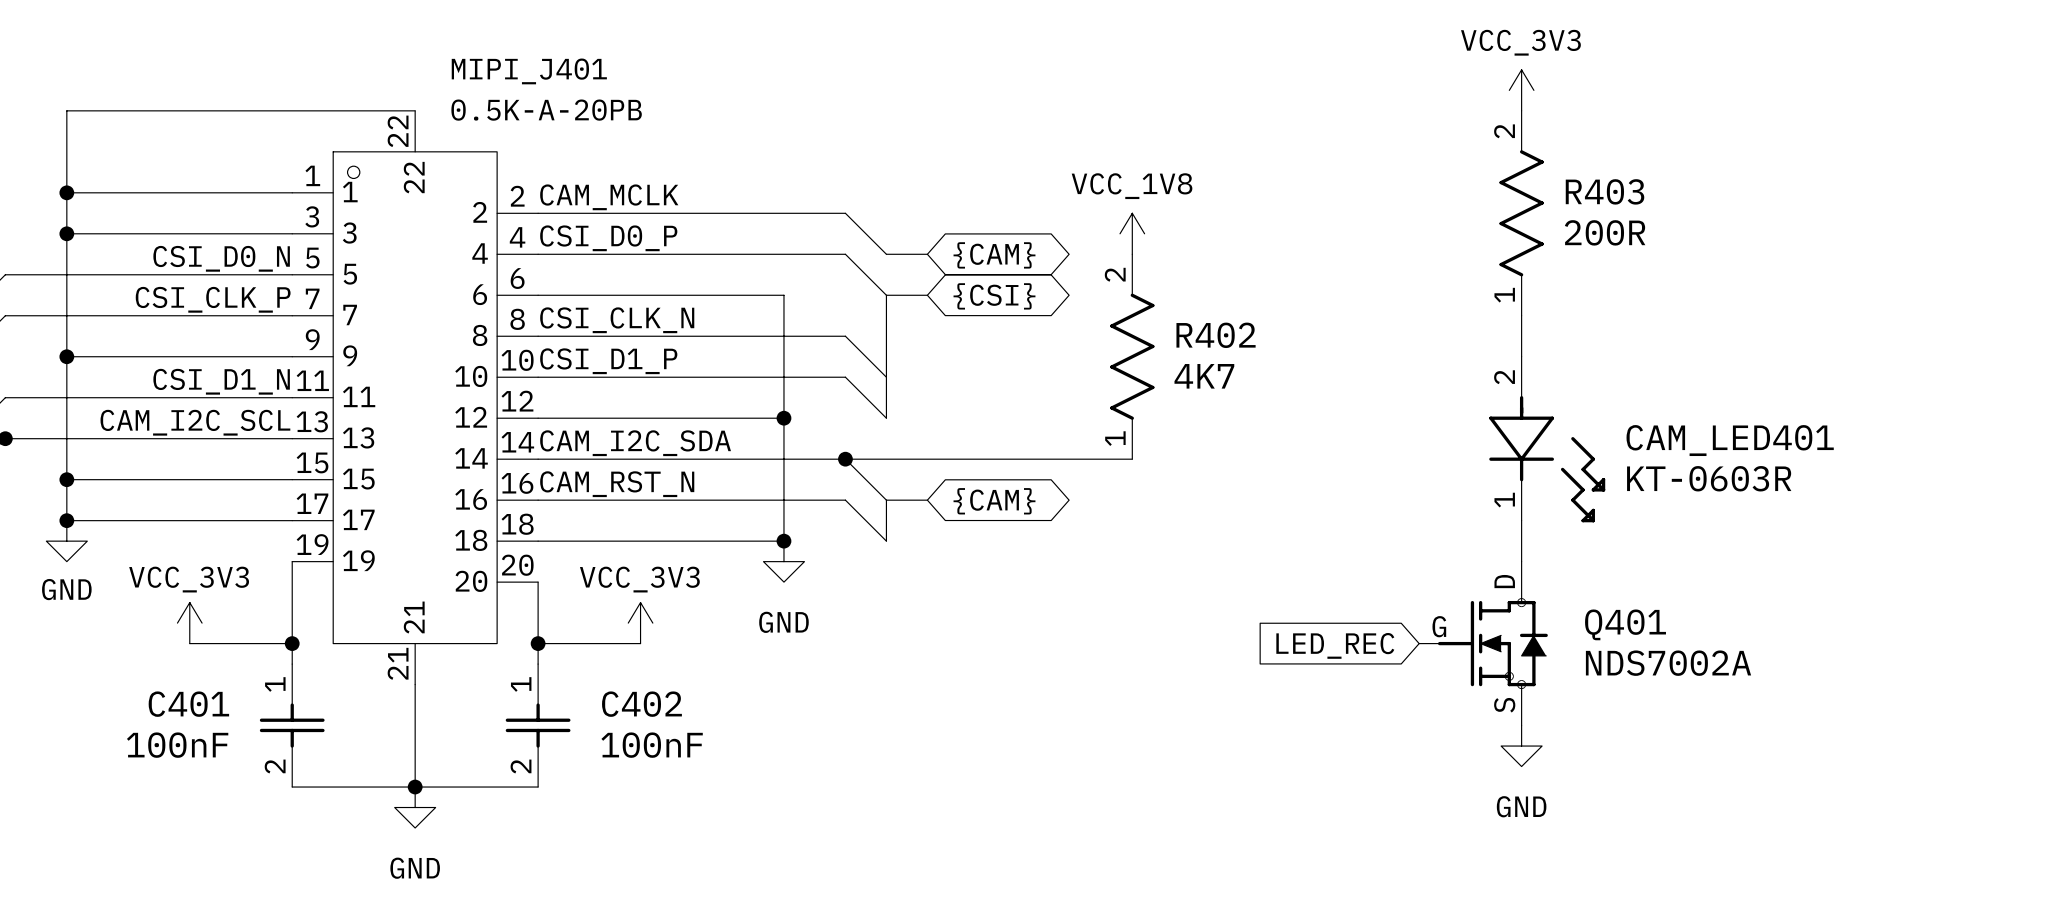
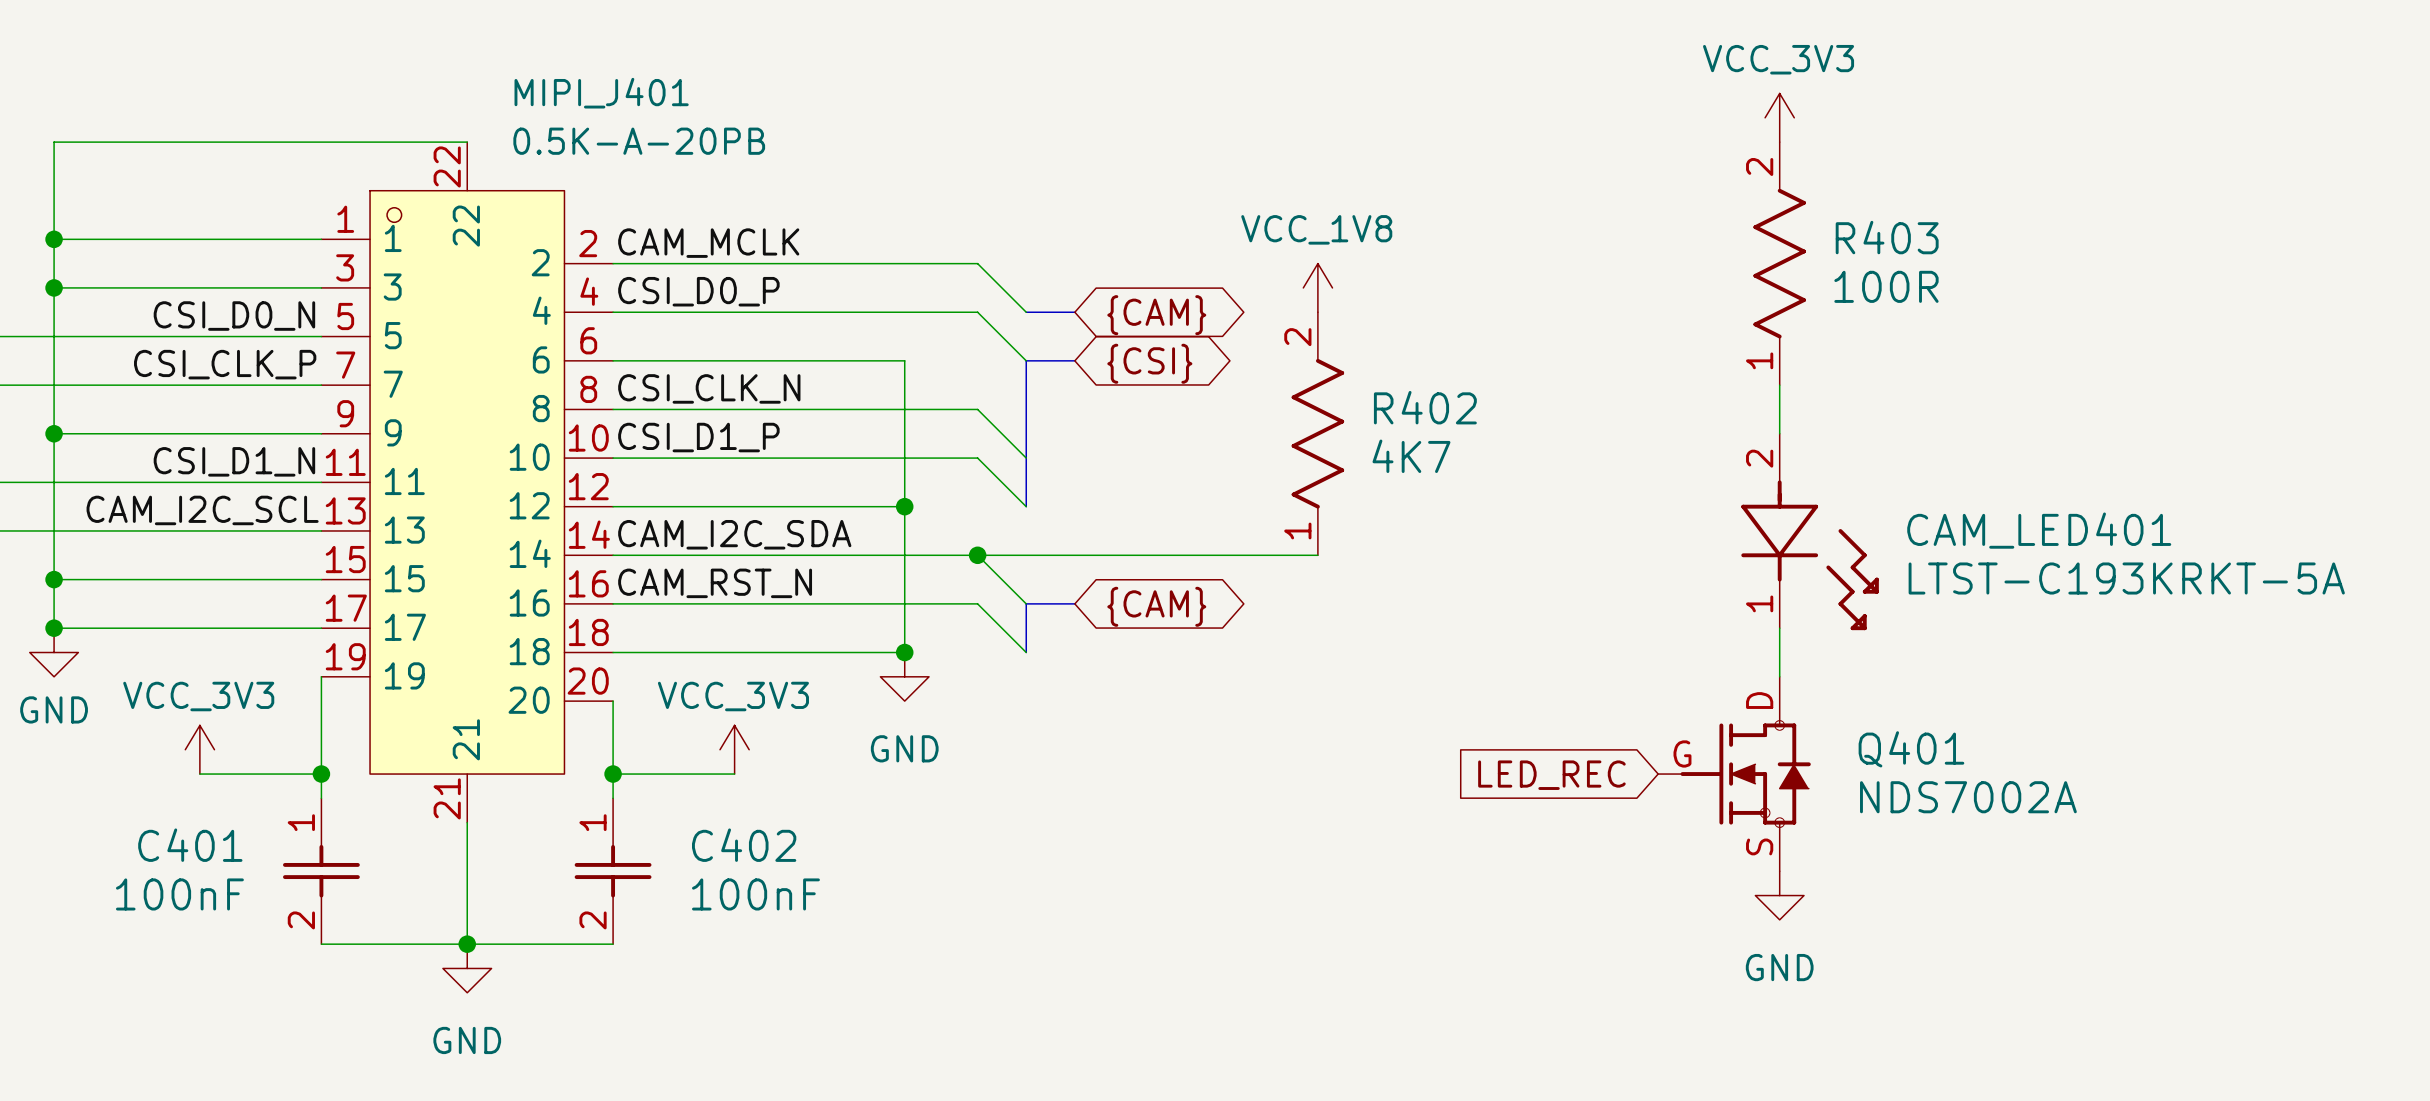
R403 value: 200R (1605, 232) -> 100R (1886, 286)
CAM_LED401 value: KT-0603R (1709, 478) -> LTST-C193KRKT-5A (2126, 578)

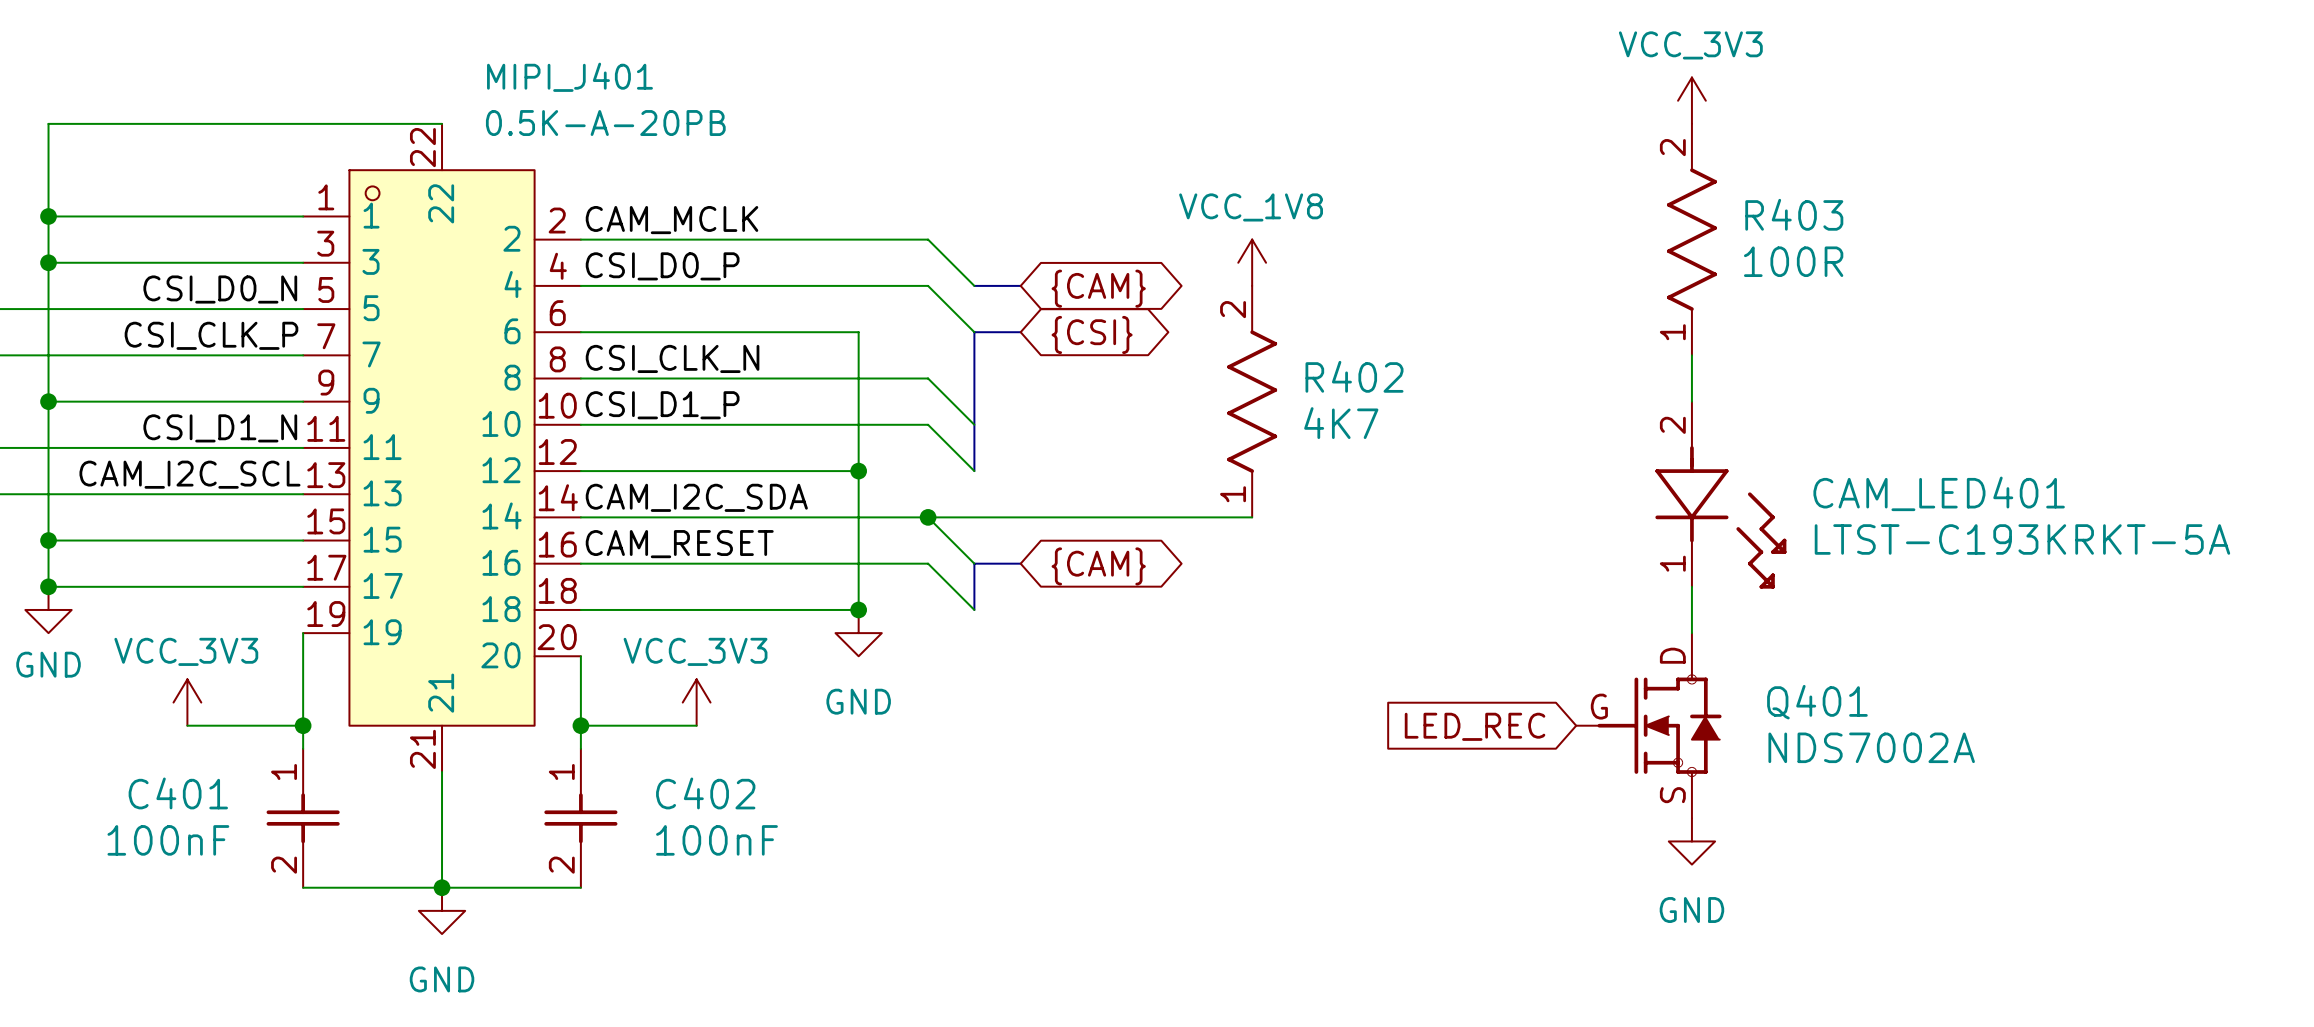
label: CAM_RST_N (715, 583) -> CAM_RESET (679, 544)

